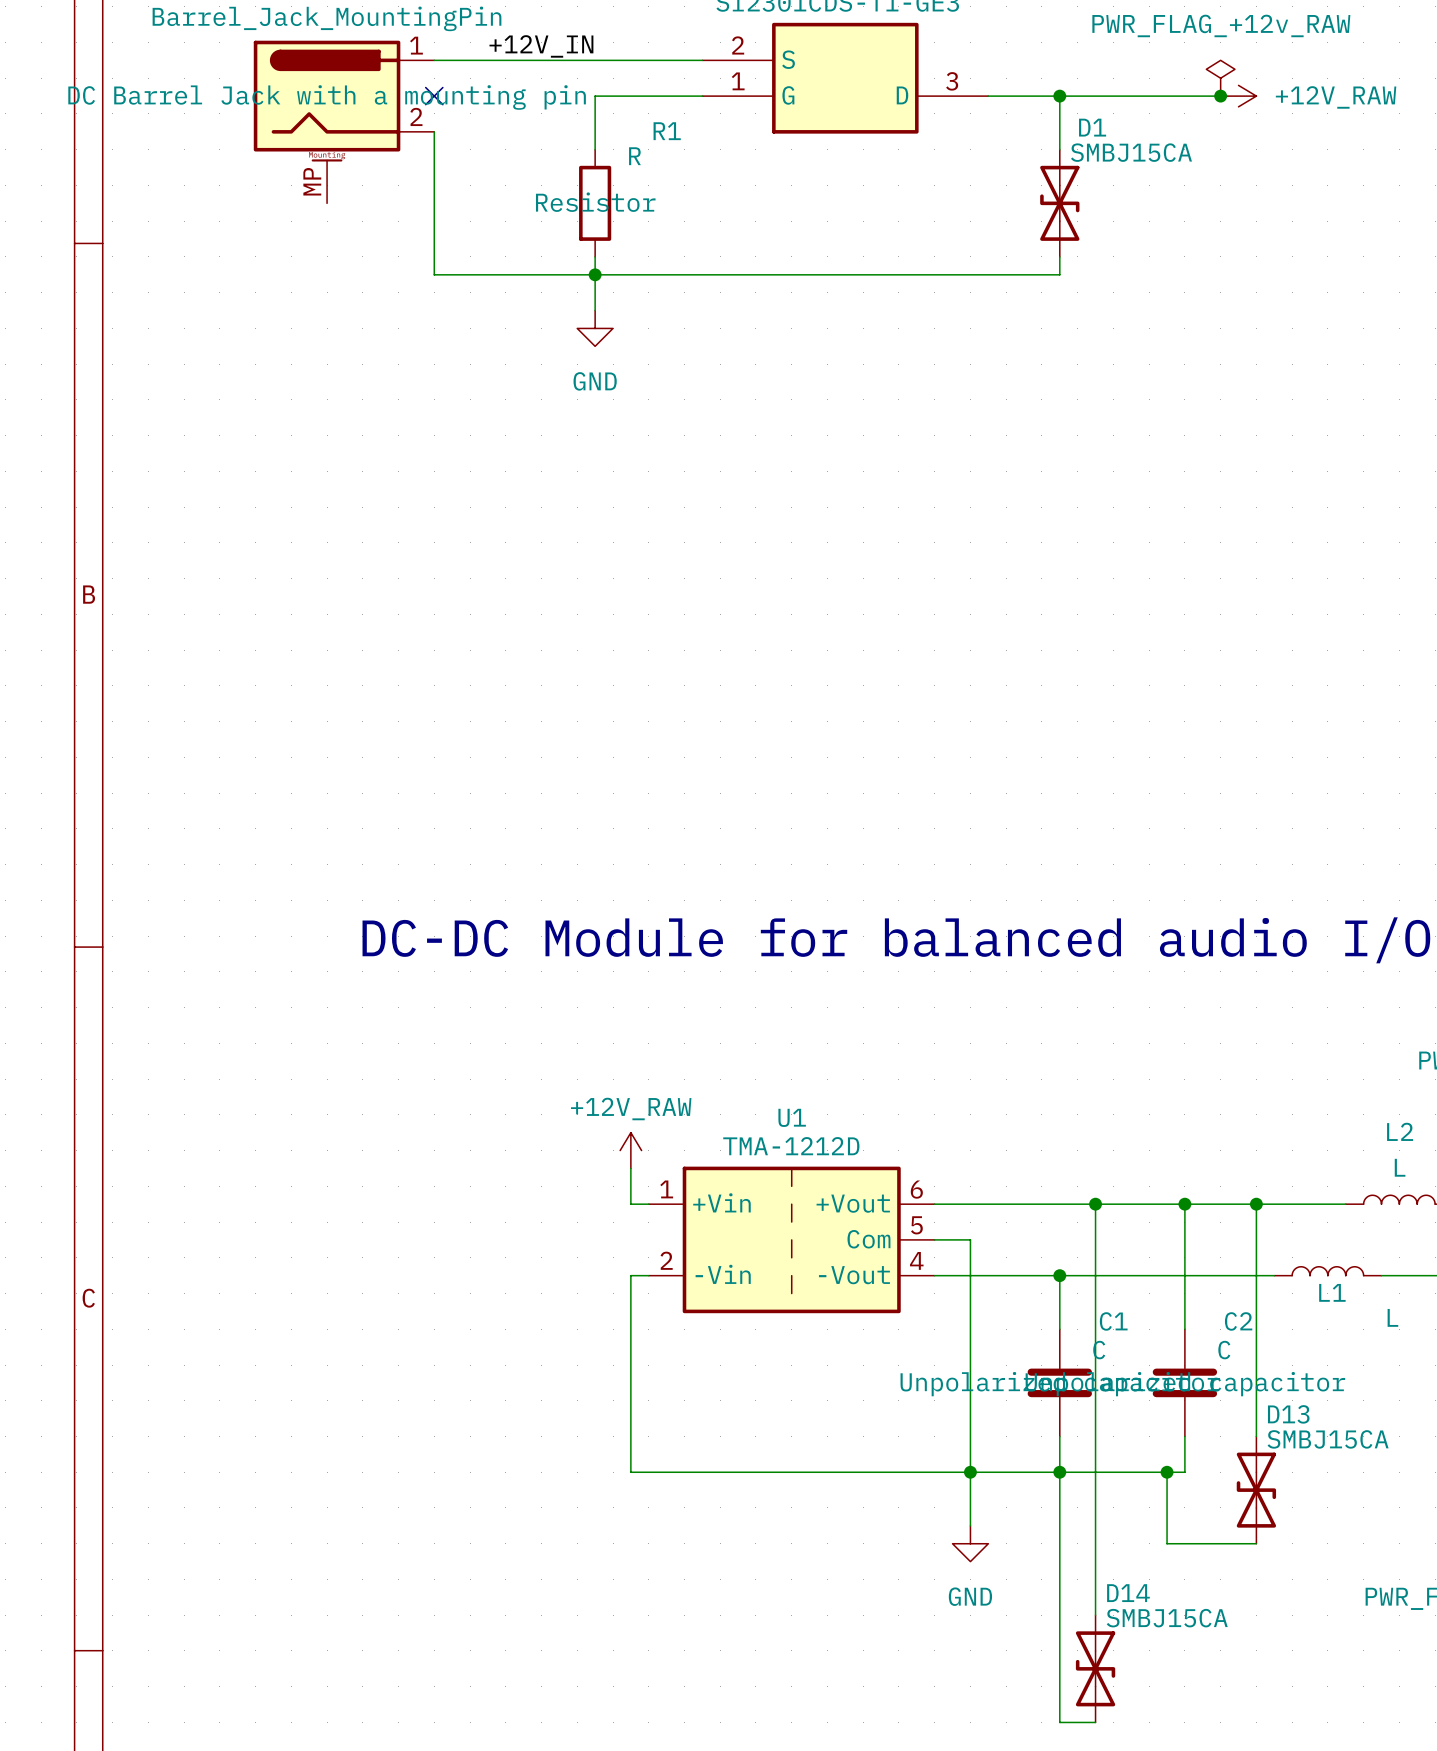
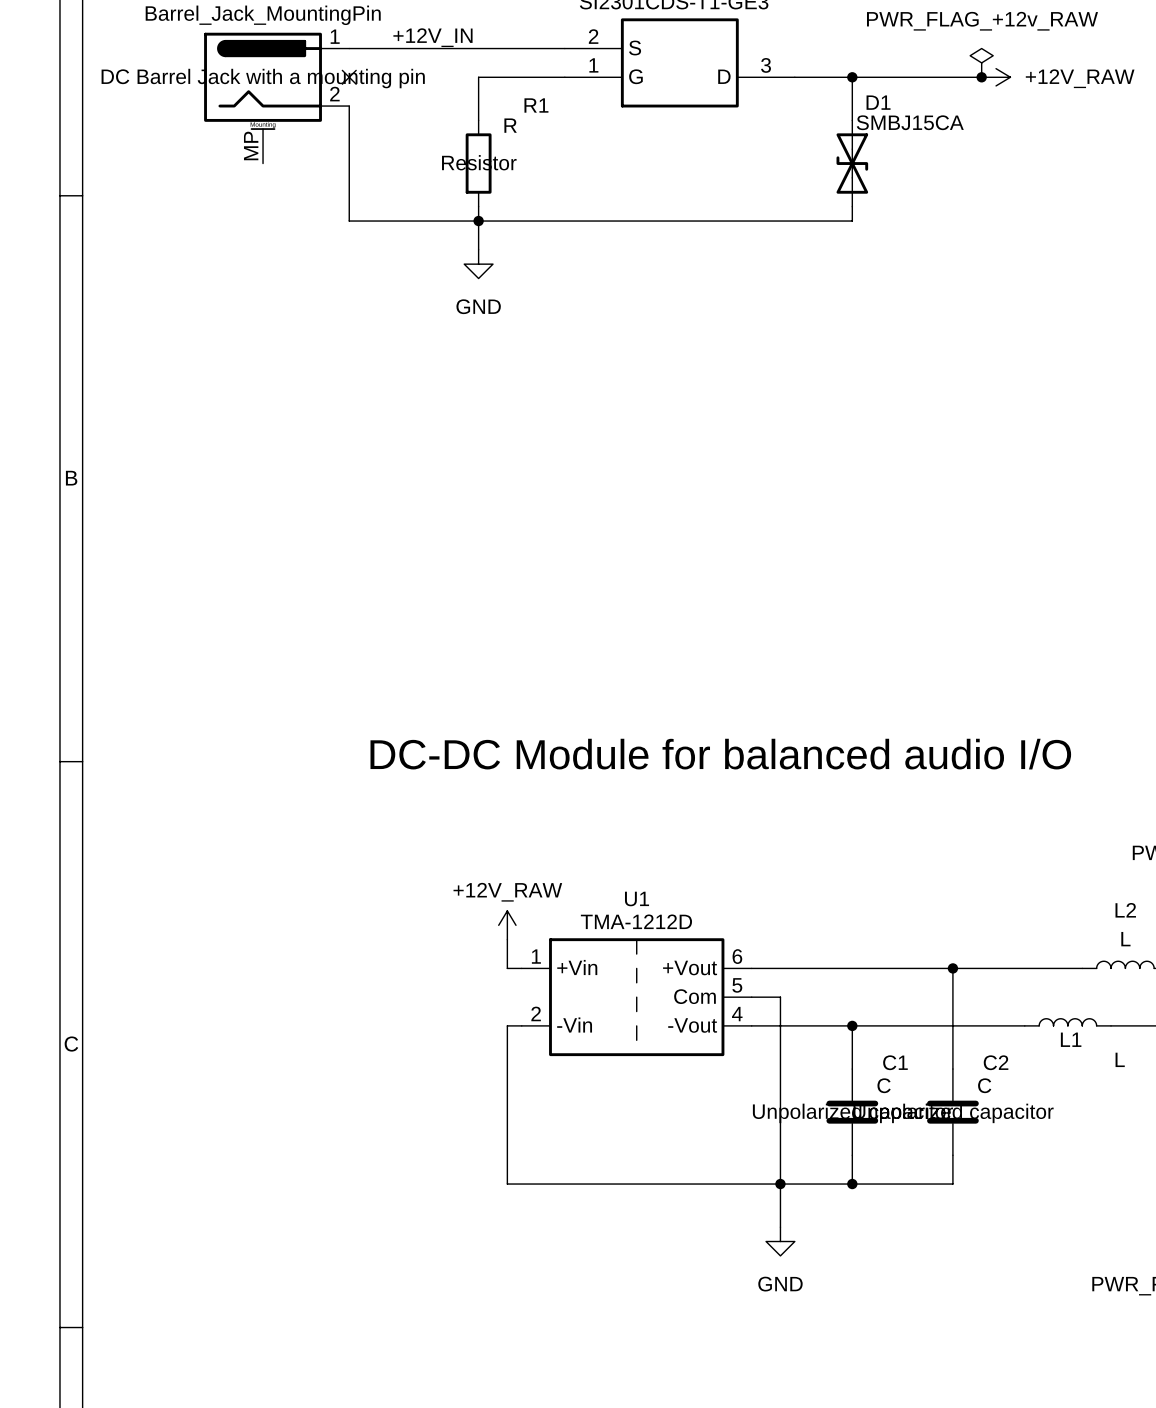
wire: (1095, 1204) (1095, 1615) -> none
junction: (1095, 1204) -> none
wire: (1256, 1204) (1256, 1436) -> none
junction: (1256, 1204) -> none
wire: (1059, 1472) (1059, 1722) (1095, 1722) -> none
wire: (1167, 1472) (1167, 1543) (1256, 1543) -> none
junction: (1167, 1472) -> none
D13: SMBJ15CA (1256, 1490) -> none
D14: SMBJ15CA (1095, 1668) -> none

